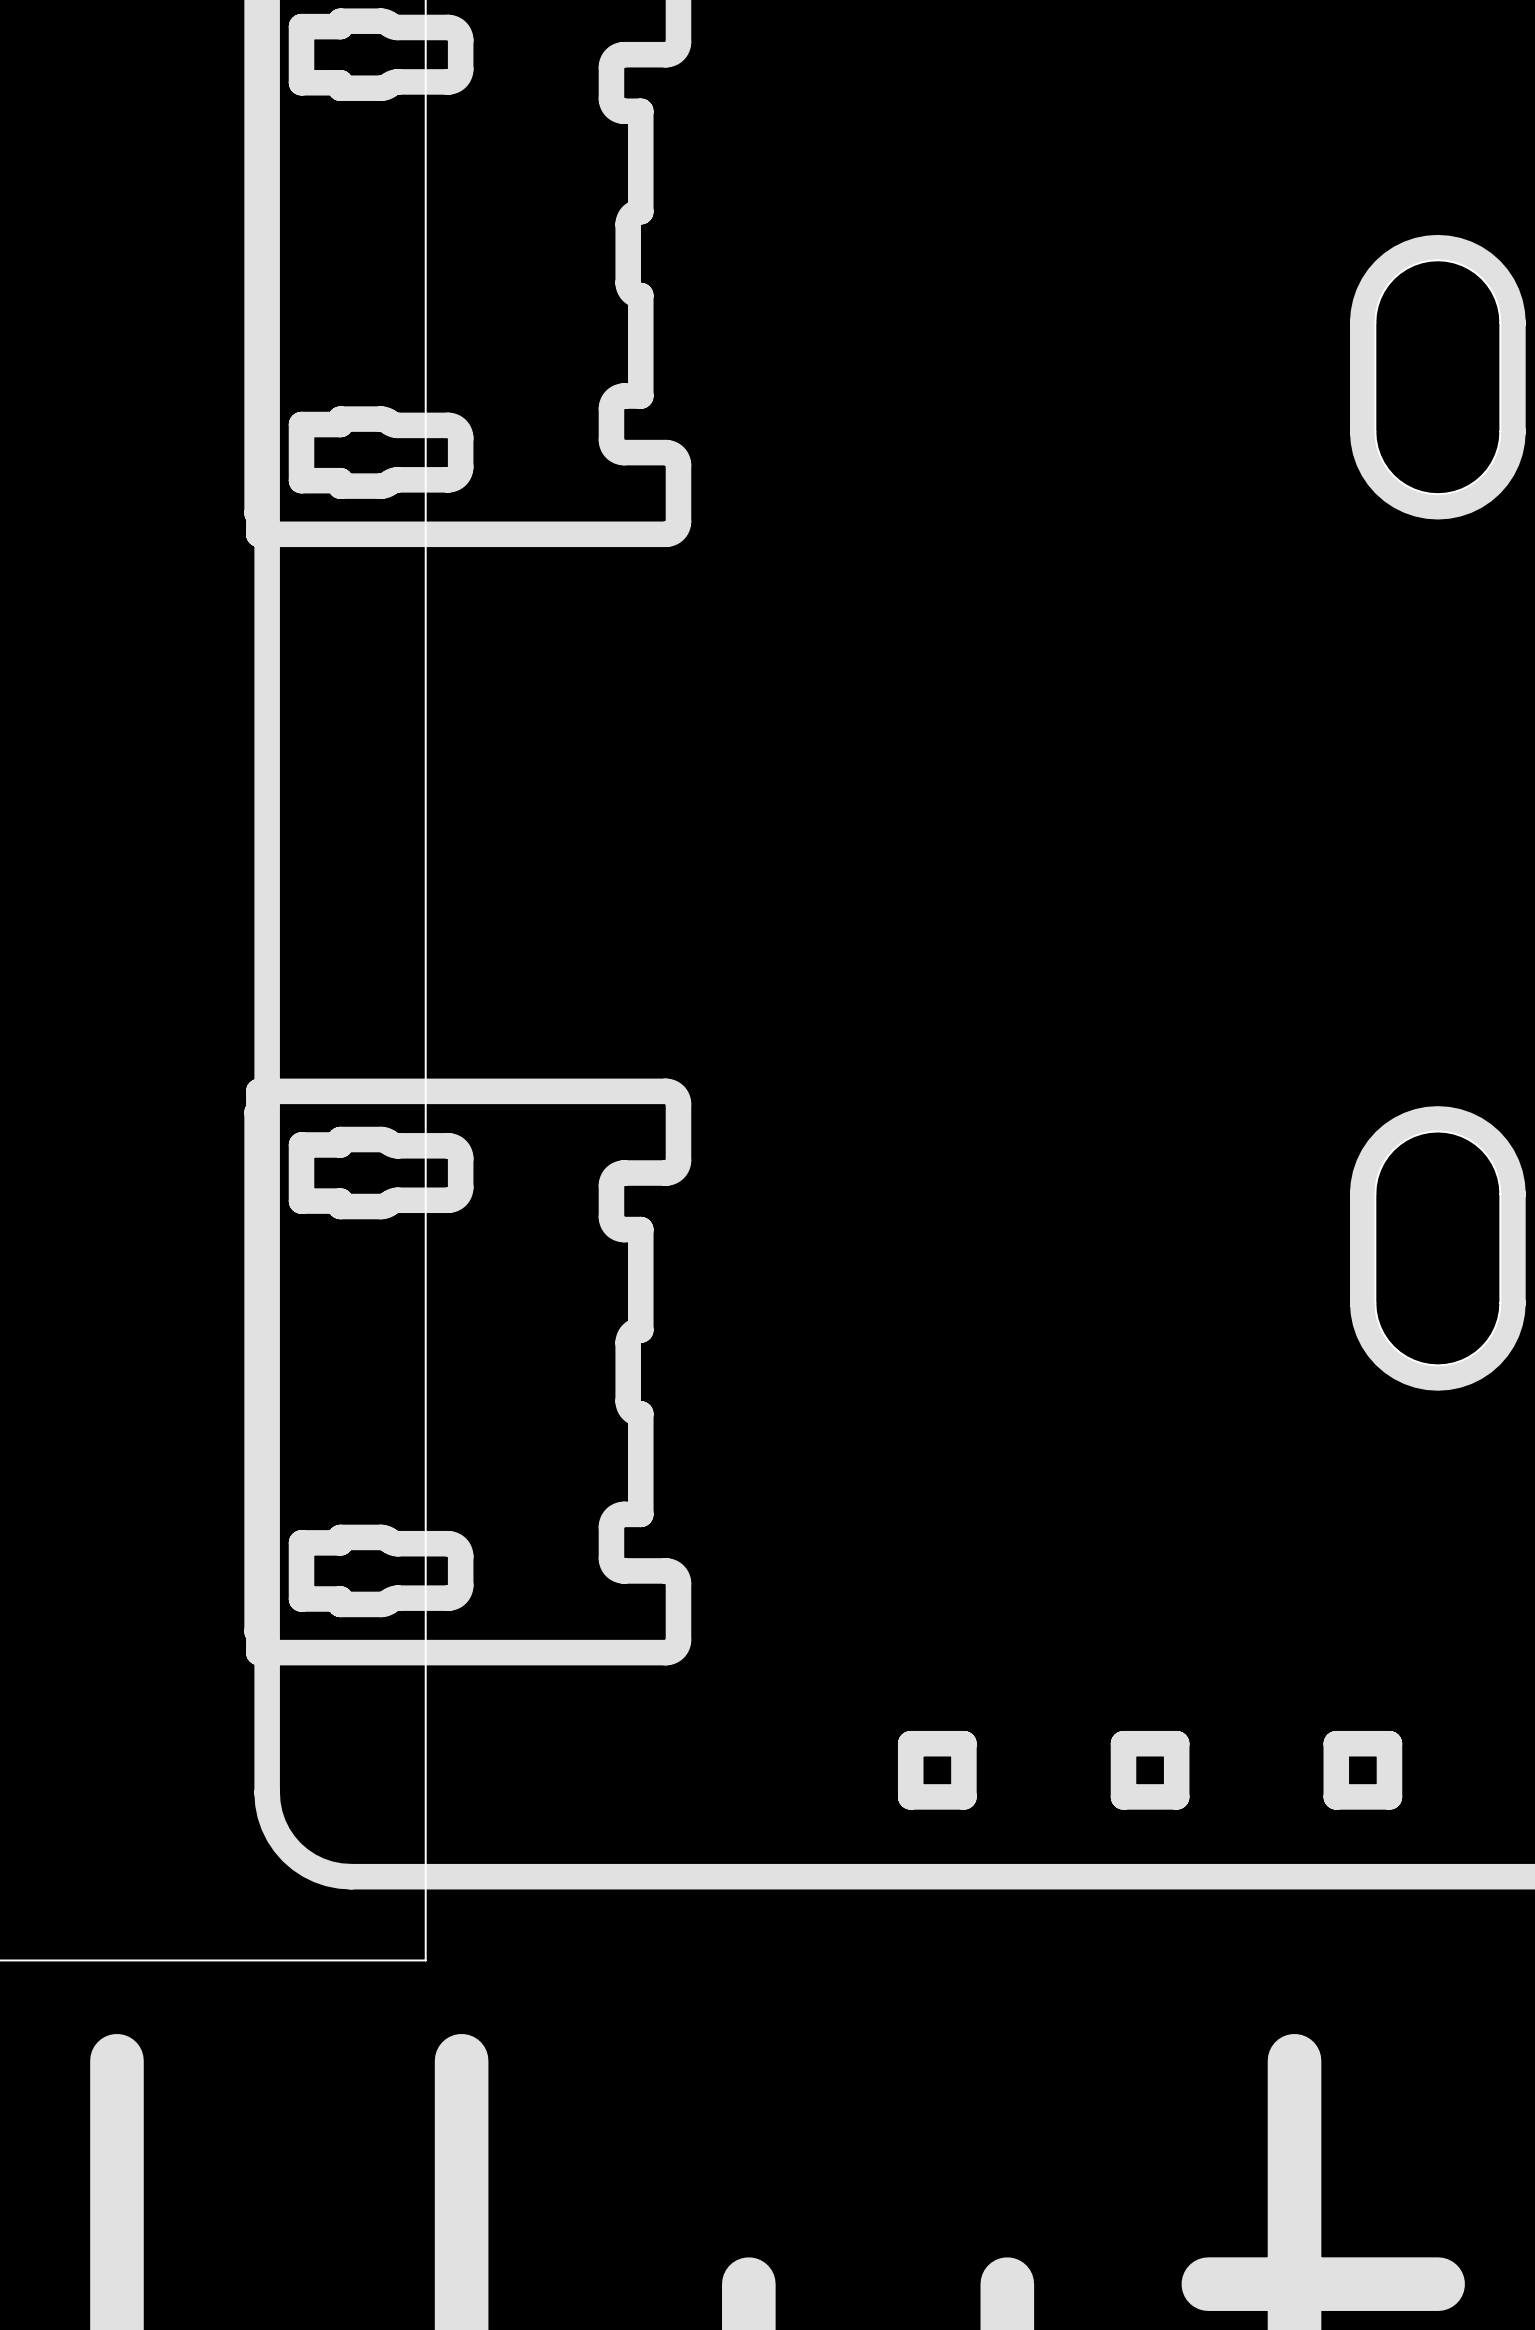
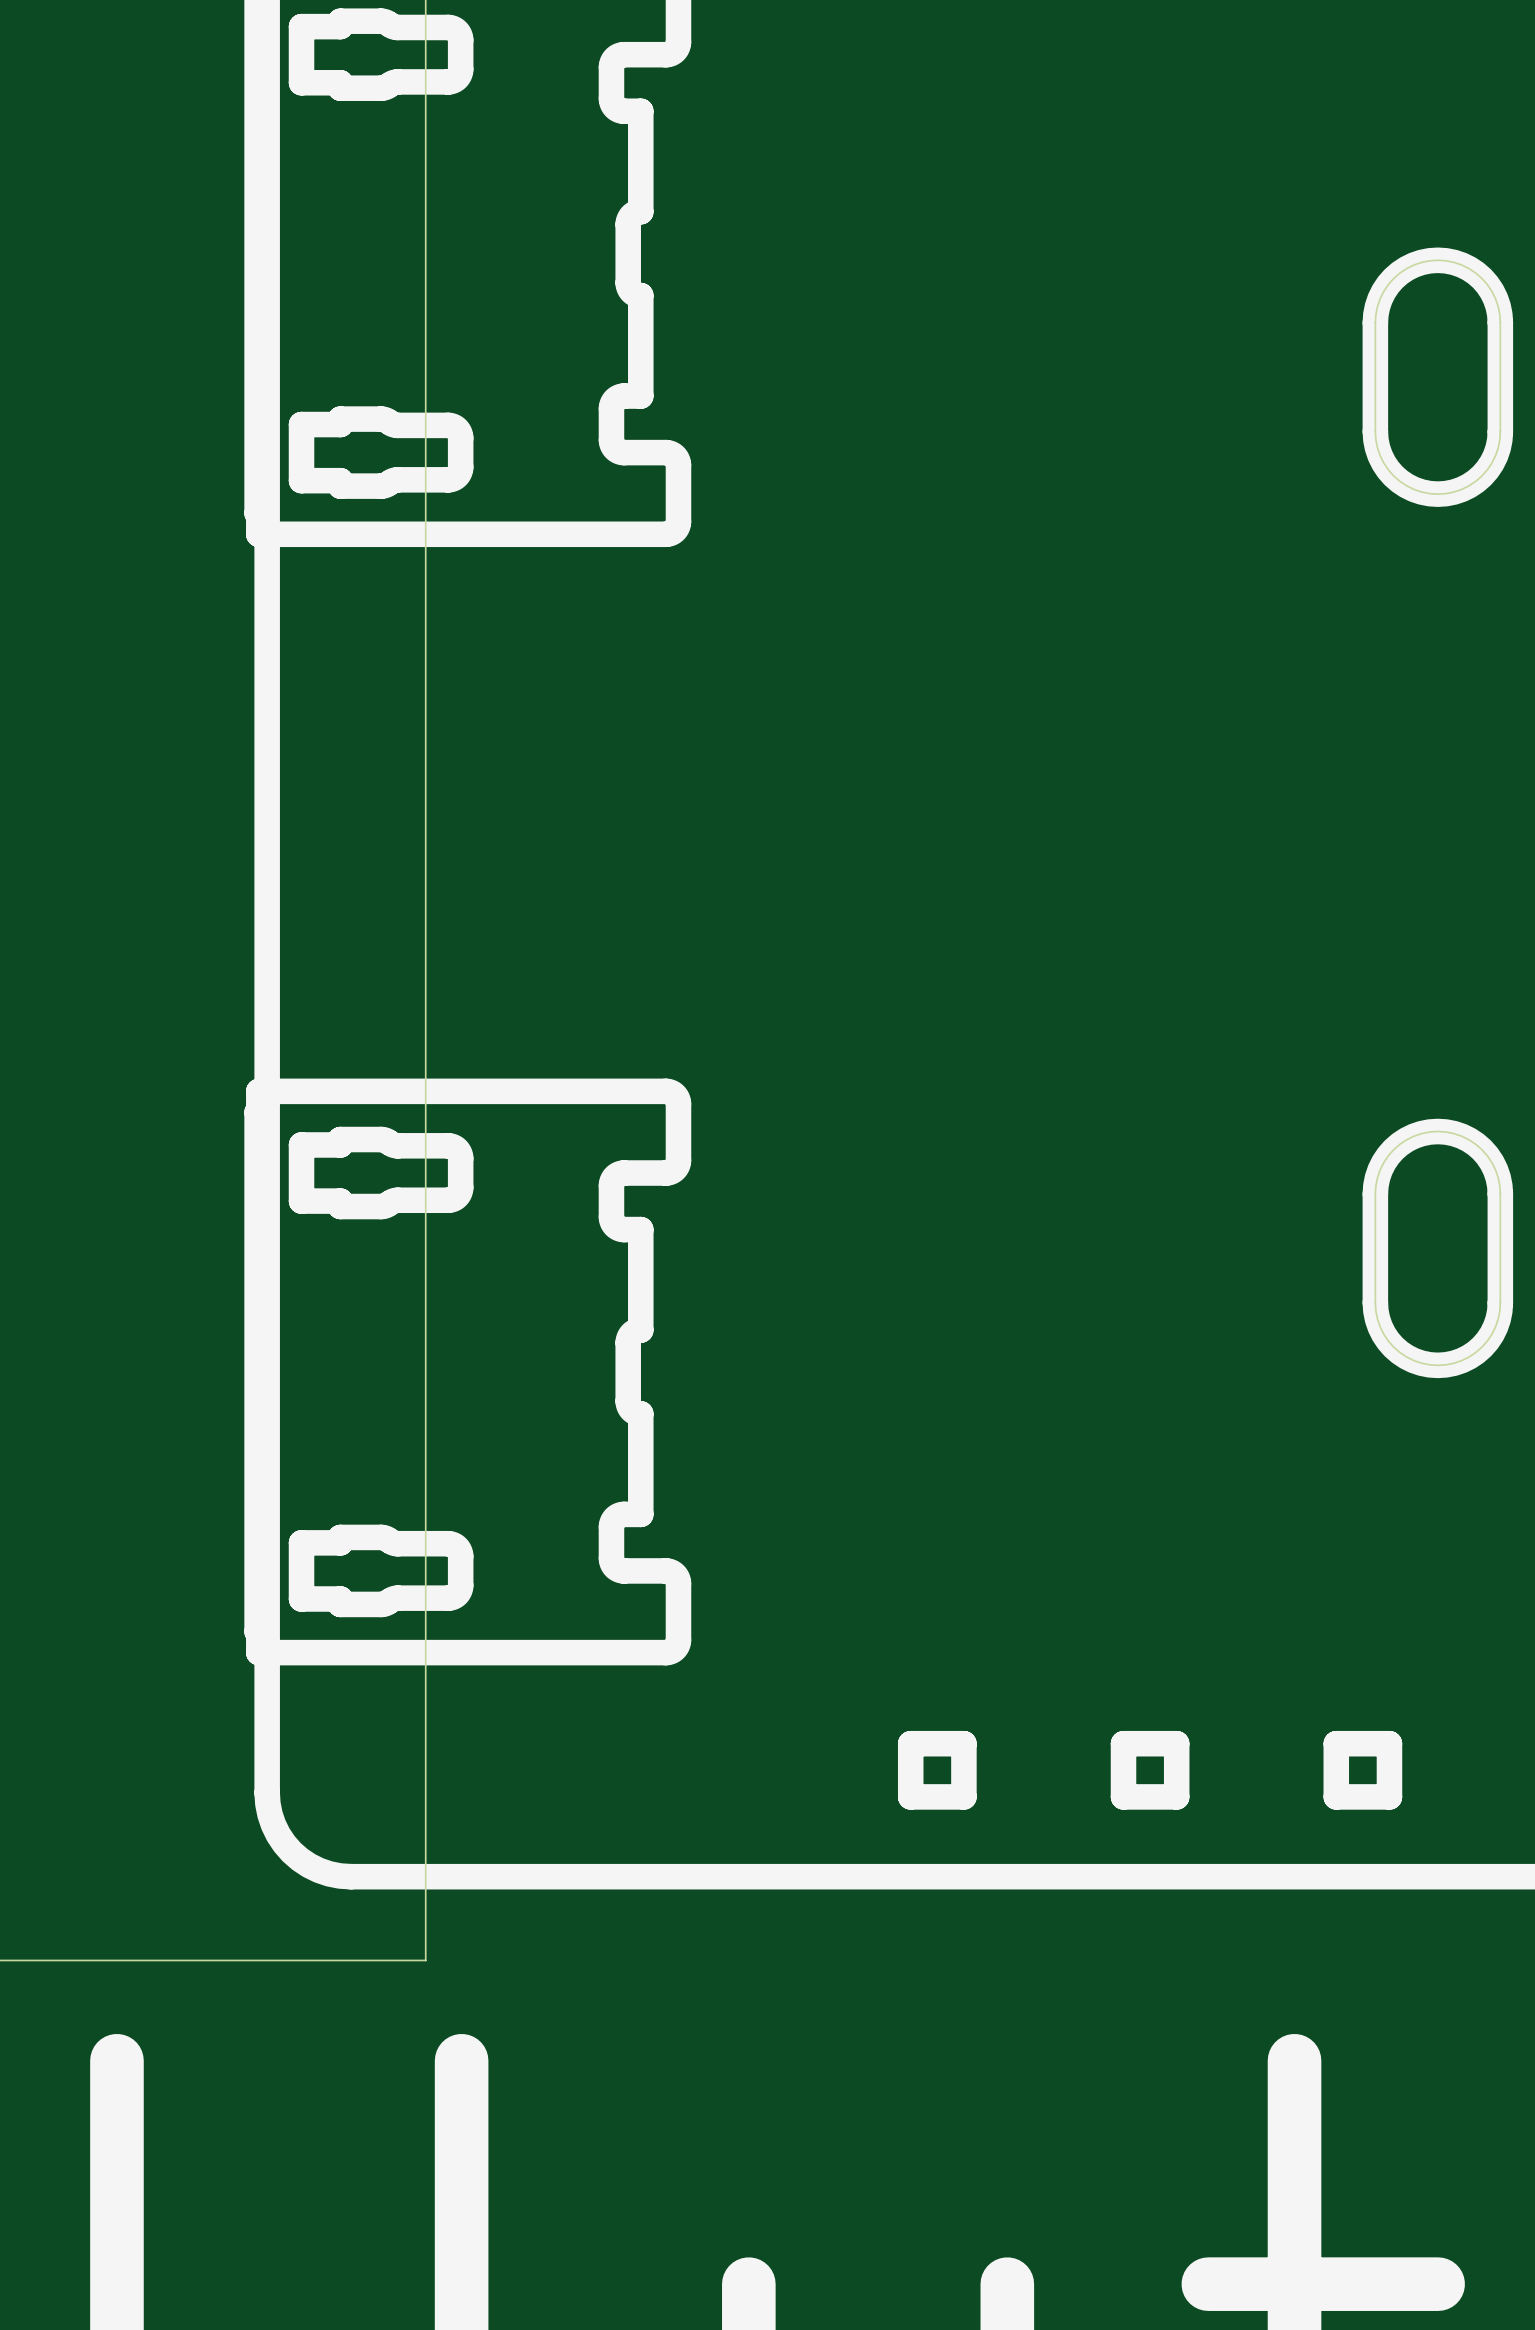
line: (1362, 322) (1363, 441) (1368, 460) (1378, 477) (1400, 496) (1428, 506) (1457, 504) (1483, 491) (1502, 469) (1510, 451) (1512, 431) (1512, 312) (1507, 294) (1497, 277) (1483, 263) (1457, 250) (1437, 247) (1418, 250) (1400, 257) (1378, 277) (1365, 303) (1362, 322) -> (1375, 322) (1375, 431) (1377, 447) (1383, 462) (1399, 481) (1421, 492) (1446, 493) (1469, 485) (1482, 475) (1491, 462) (1499, 439) (1500, 322) (1498, 306) (1491, 291) (1482, 278) (1461, 265) (1446, 260) (1421, 262) (1399, 273) (1388, 284) (1380, 298) (1375, 322)
line: (1362, 1193) (1363, 1312) (1368, 1331) (1378, 1348) (1400, 1367) (1428, 1377) (1457, 1375) (1483, 1362) (1502, 1340) (1510, 1322) (1512, 1302) (1512, 1184) (1507, 1165) (1497, 1148) (1483, 1134) (1457, 1121) (1437, 1118) (1418, 1121) (1400, 1128) (1378, 1148) (1365, 1174) (1362, 1193) -> (1375, 1193) (1375, 1302) (1377, 1319) (1383, 1334) (1399, 1352) (1421, 1363) (1446, 1364) (1469, 1356) (1482, 1347) (1491, 1334) (1499, 1311) (1500, 1193) (1498, 1177) (1491, 1162) (1482, 1149) (1461, 1136) (1446, 1132) (1421, 1133) (1399, 1144) (1388, 1155) (1380, 1170) (1375, 1193)

